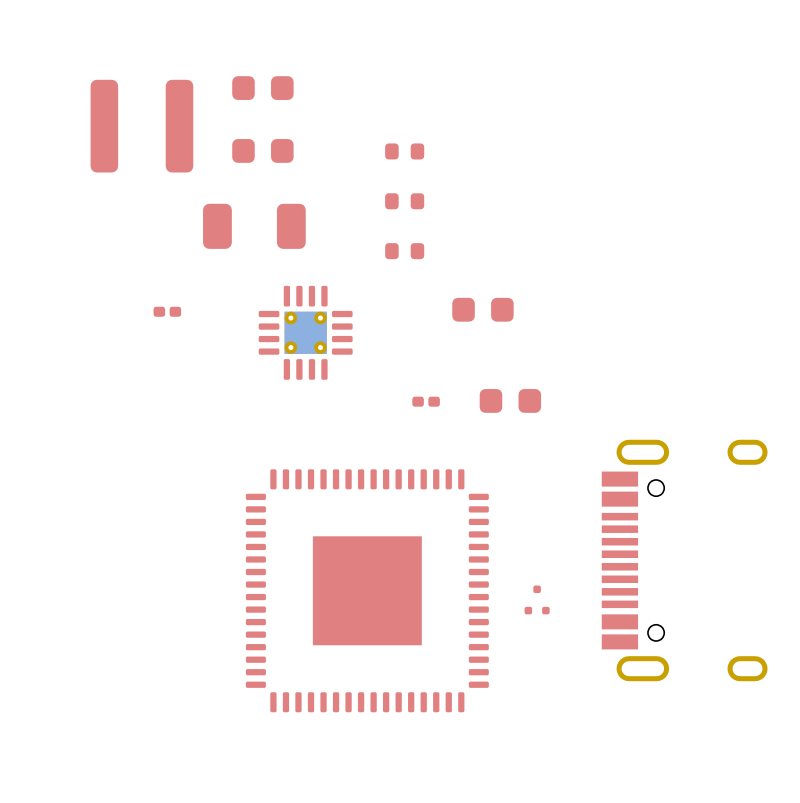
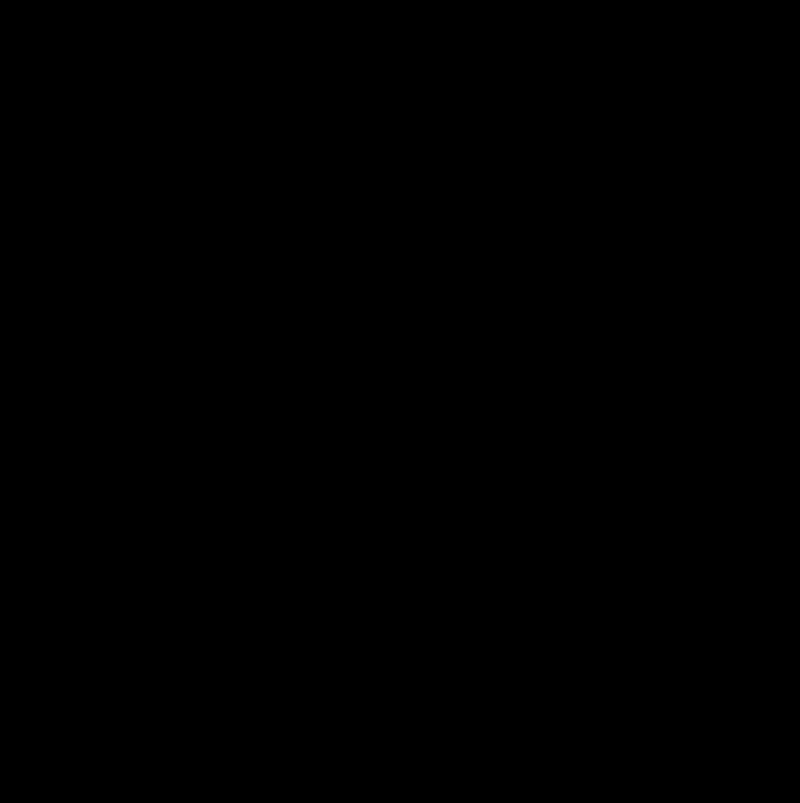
part: (262, 88) -> none
part: (141, 126) -> none
part: (262, 150) -> none
part: (404, 151) -> none
part: (404, 201) -> none
part: (254, 226) -> none
part: (404, 251) -> none
part: (482, 309) -> none
part: (167, 311) -> none
part: (305, 332) -> none
part: (510, 400) -> none
part: (426, 401) -> none
part: (684, 560) -> none
part: (367, 590) -> none
part: (537, 599) -> none

